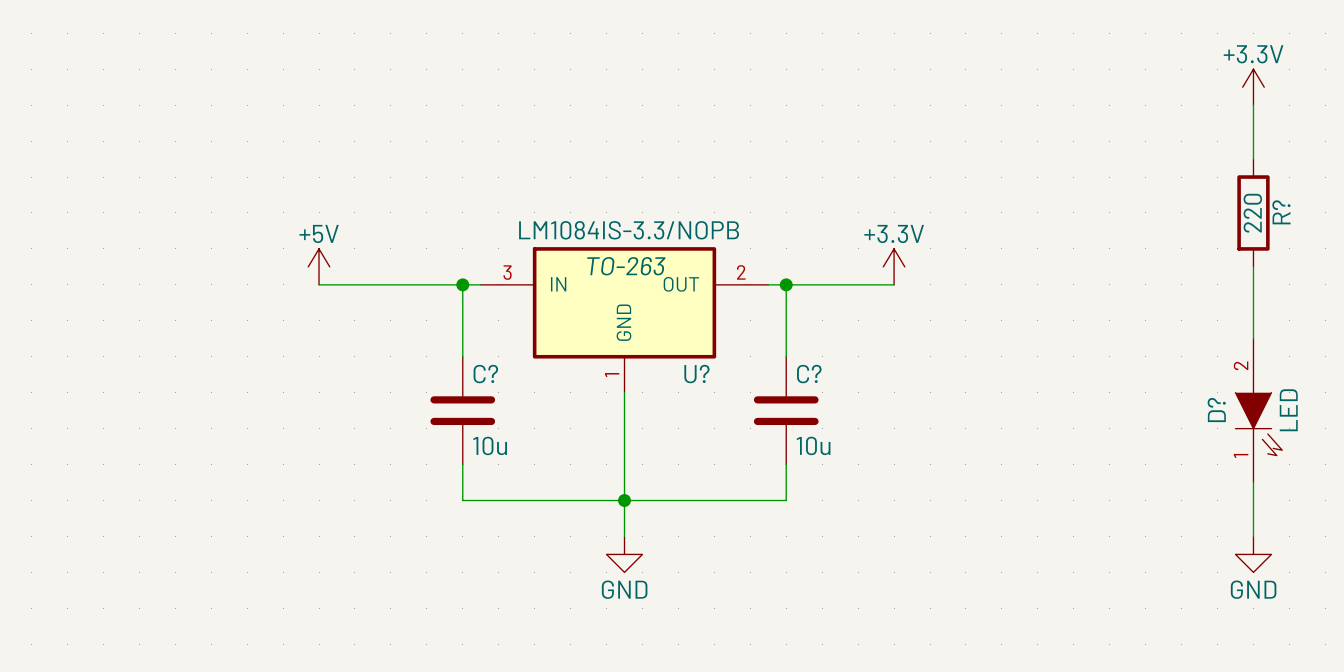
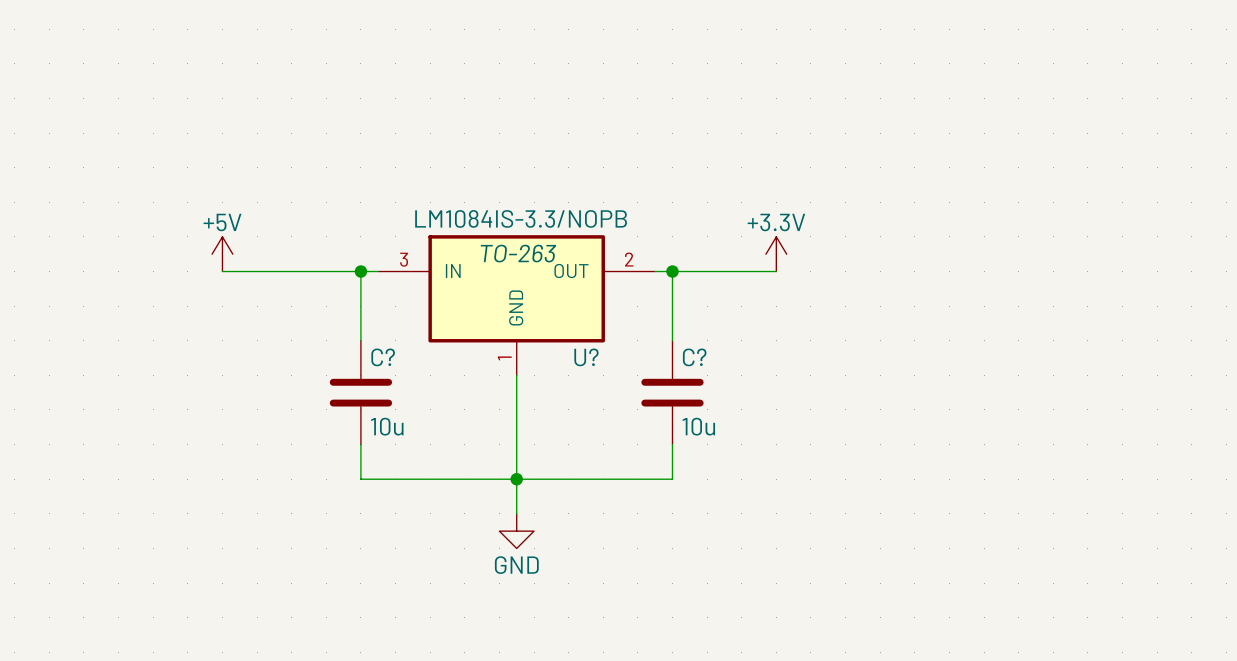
power symbol: +3.3V (1253, 87) -> none
wire: (1253, 105) (1253, 159) -> none
R?: 220 (1253, 212) -> none
wire: (1253, 266) (1253, 338) -> none
D?: LED (1258, 410) -> none
wire: (1253, 482) (1253, 536) -> none
power symbol: GND (1253, 554) -> none

